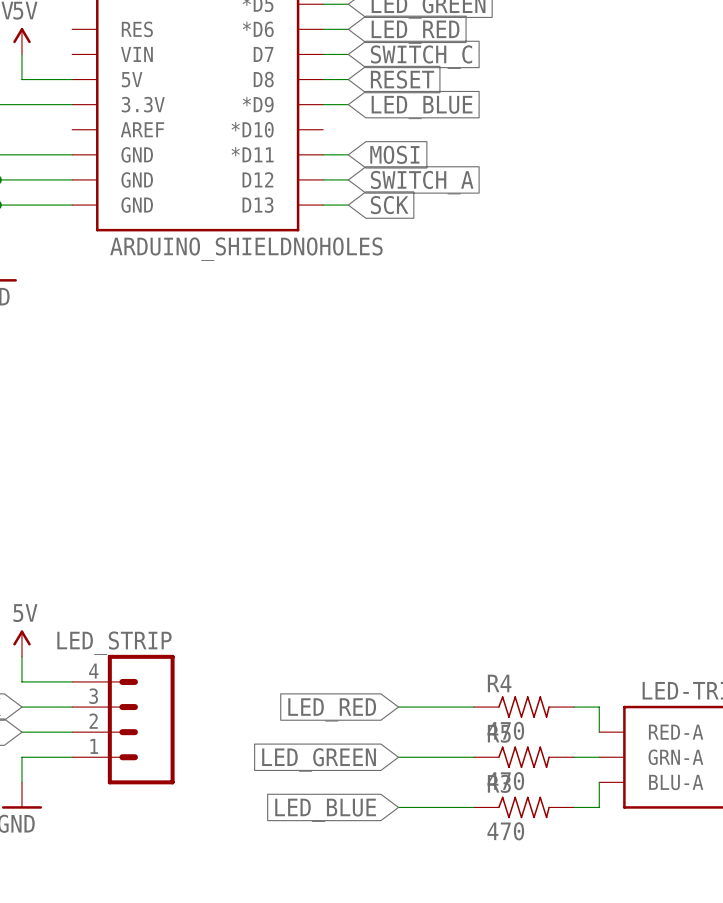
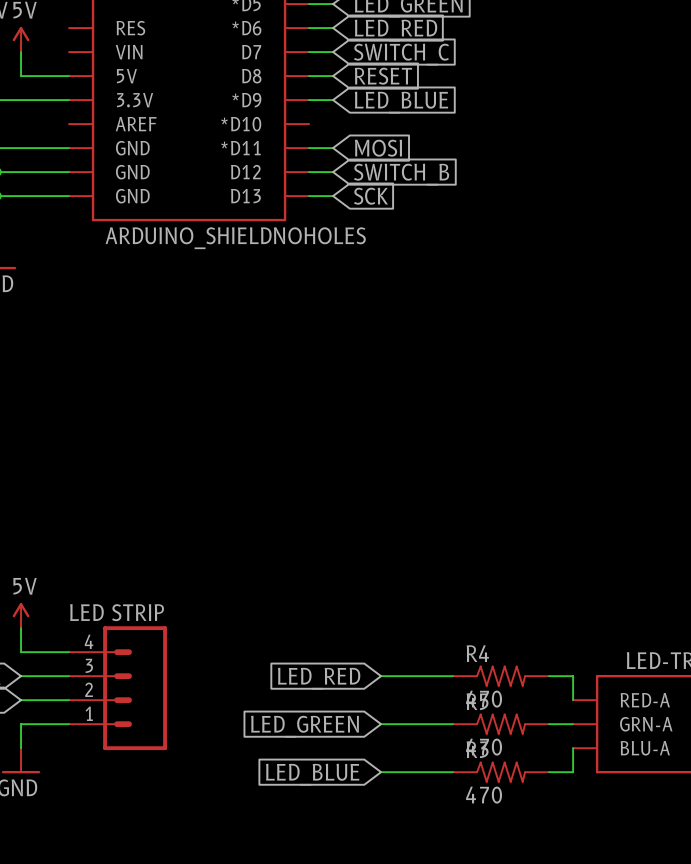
global label: SWITCH_A (422, 182) -> SWITCH_B (401, 174)
LED_STRIP name: LED_STRIP (114, 643) -> LED STRIP (117, 612)

